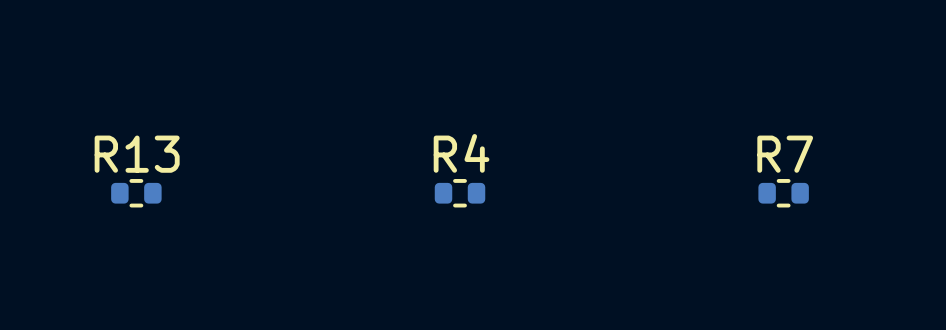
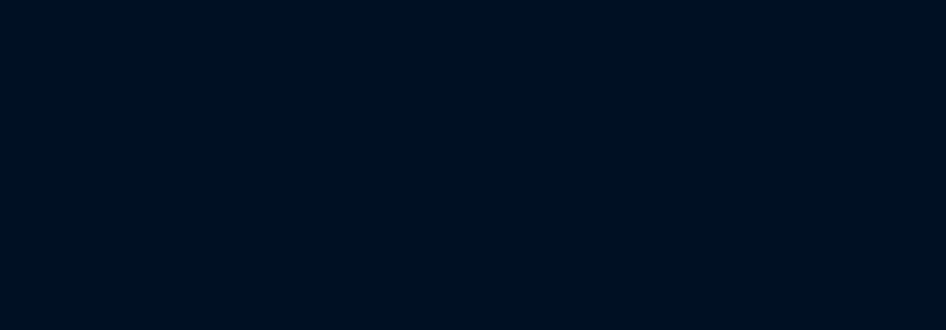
R13: (136, 193) -> none
R4: (460, 193) -> none
R7: (783, 193) -> none

